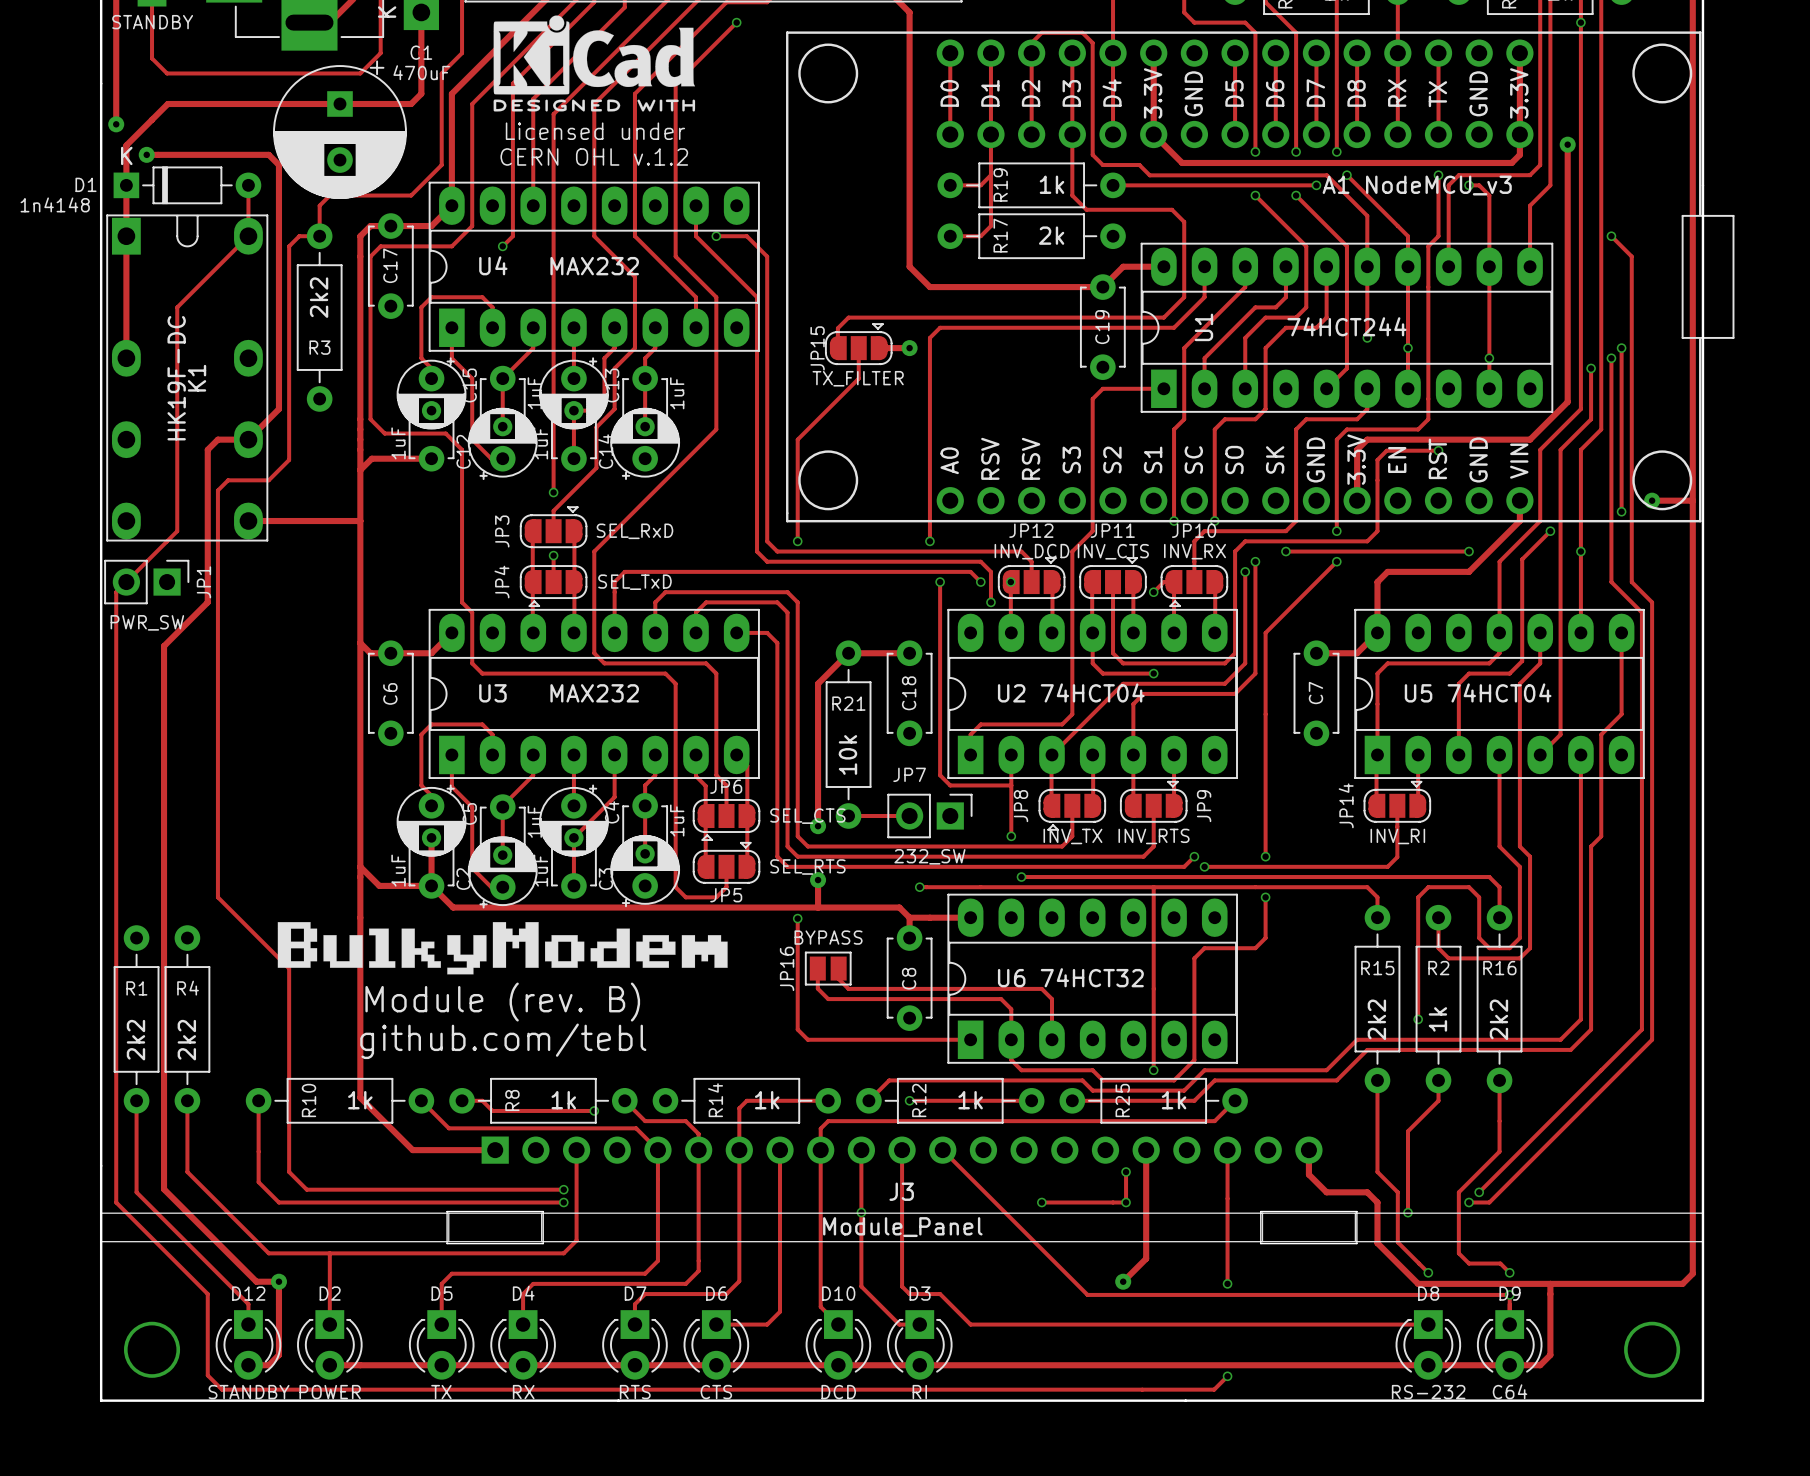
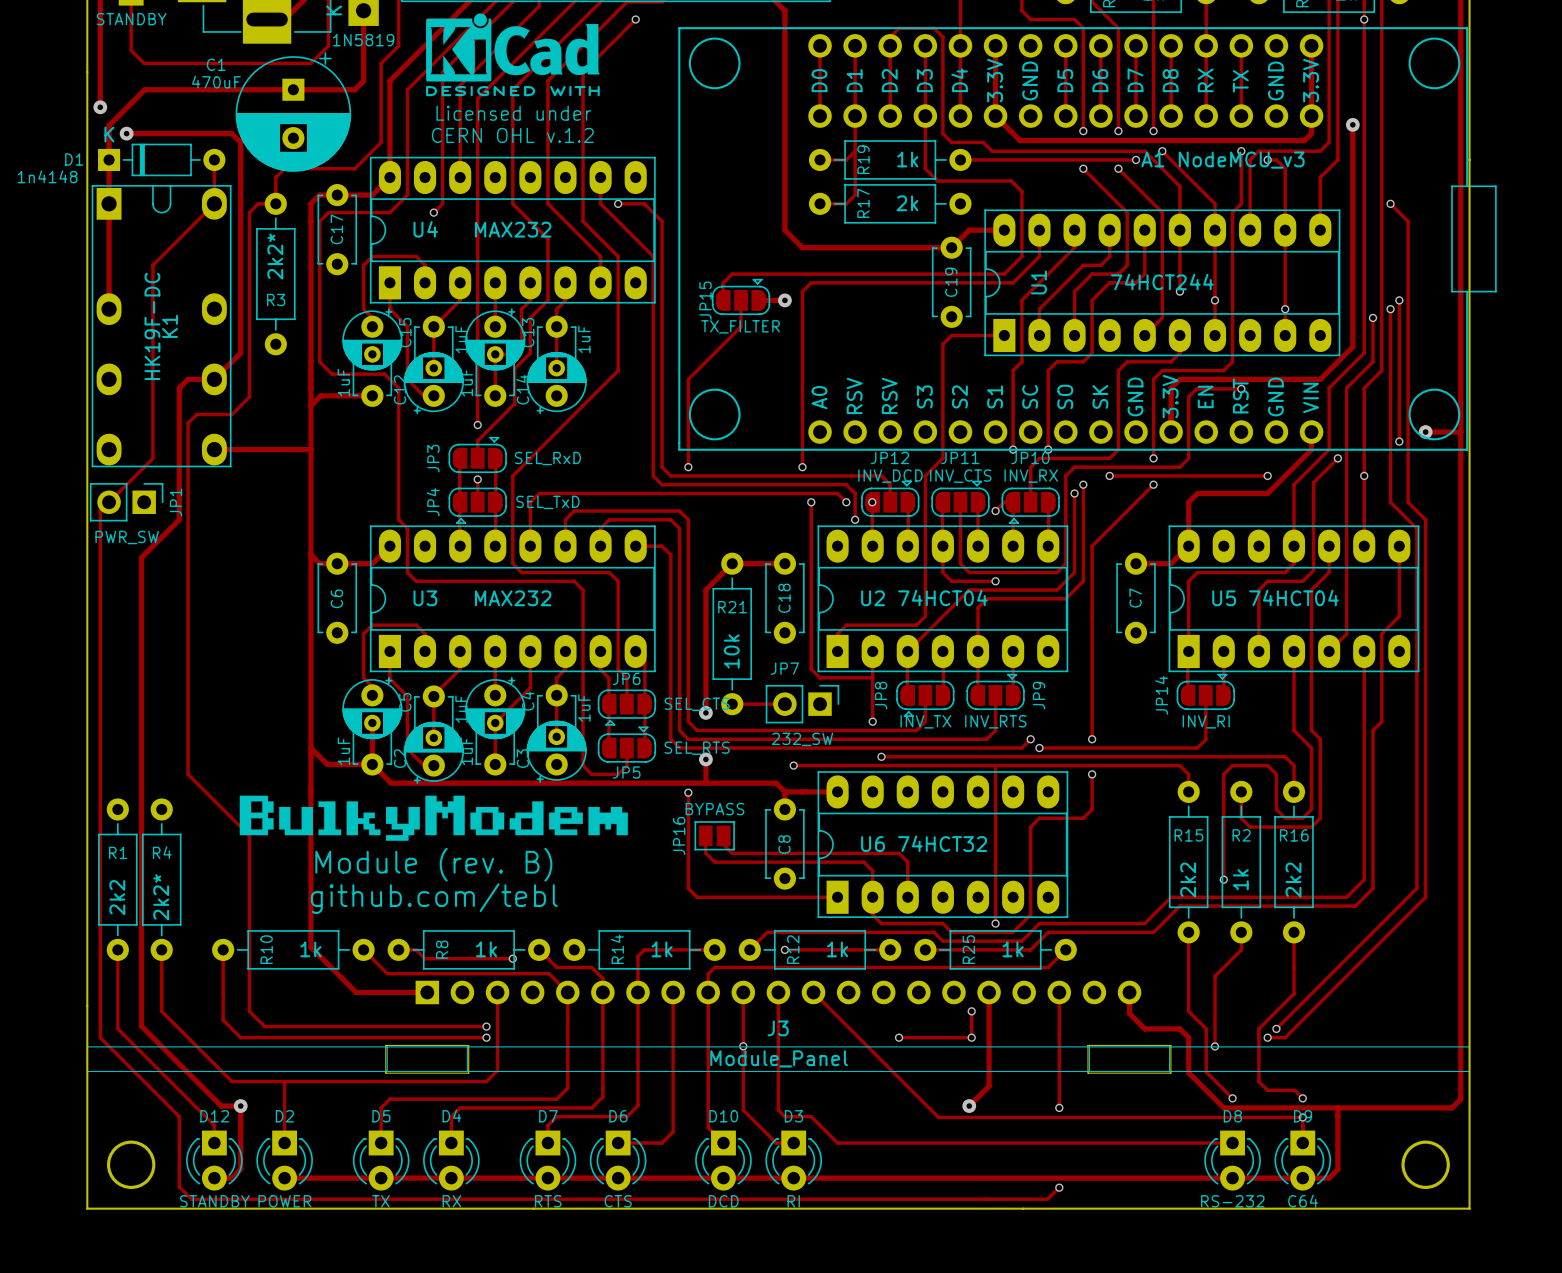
part value: none -> 1N5819 (363, 40)
C1 name position: C1 (421, 52) -> C1 (216, 64)
C1 value position: 470uF (421, 72) -> 470uF (216, 82)
R3 value: 2k2 (319, 297) -> 2k2* (275, 256)
R4 value: 2k2 (186, 1040) -> 2k2* (161, 897)

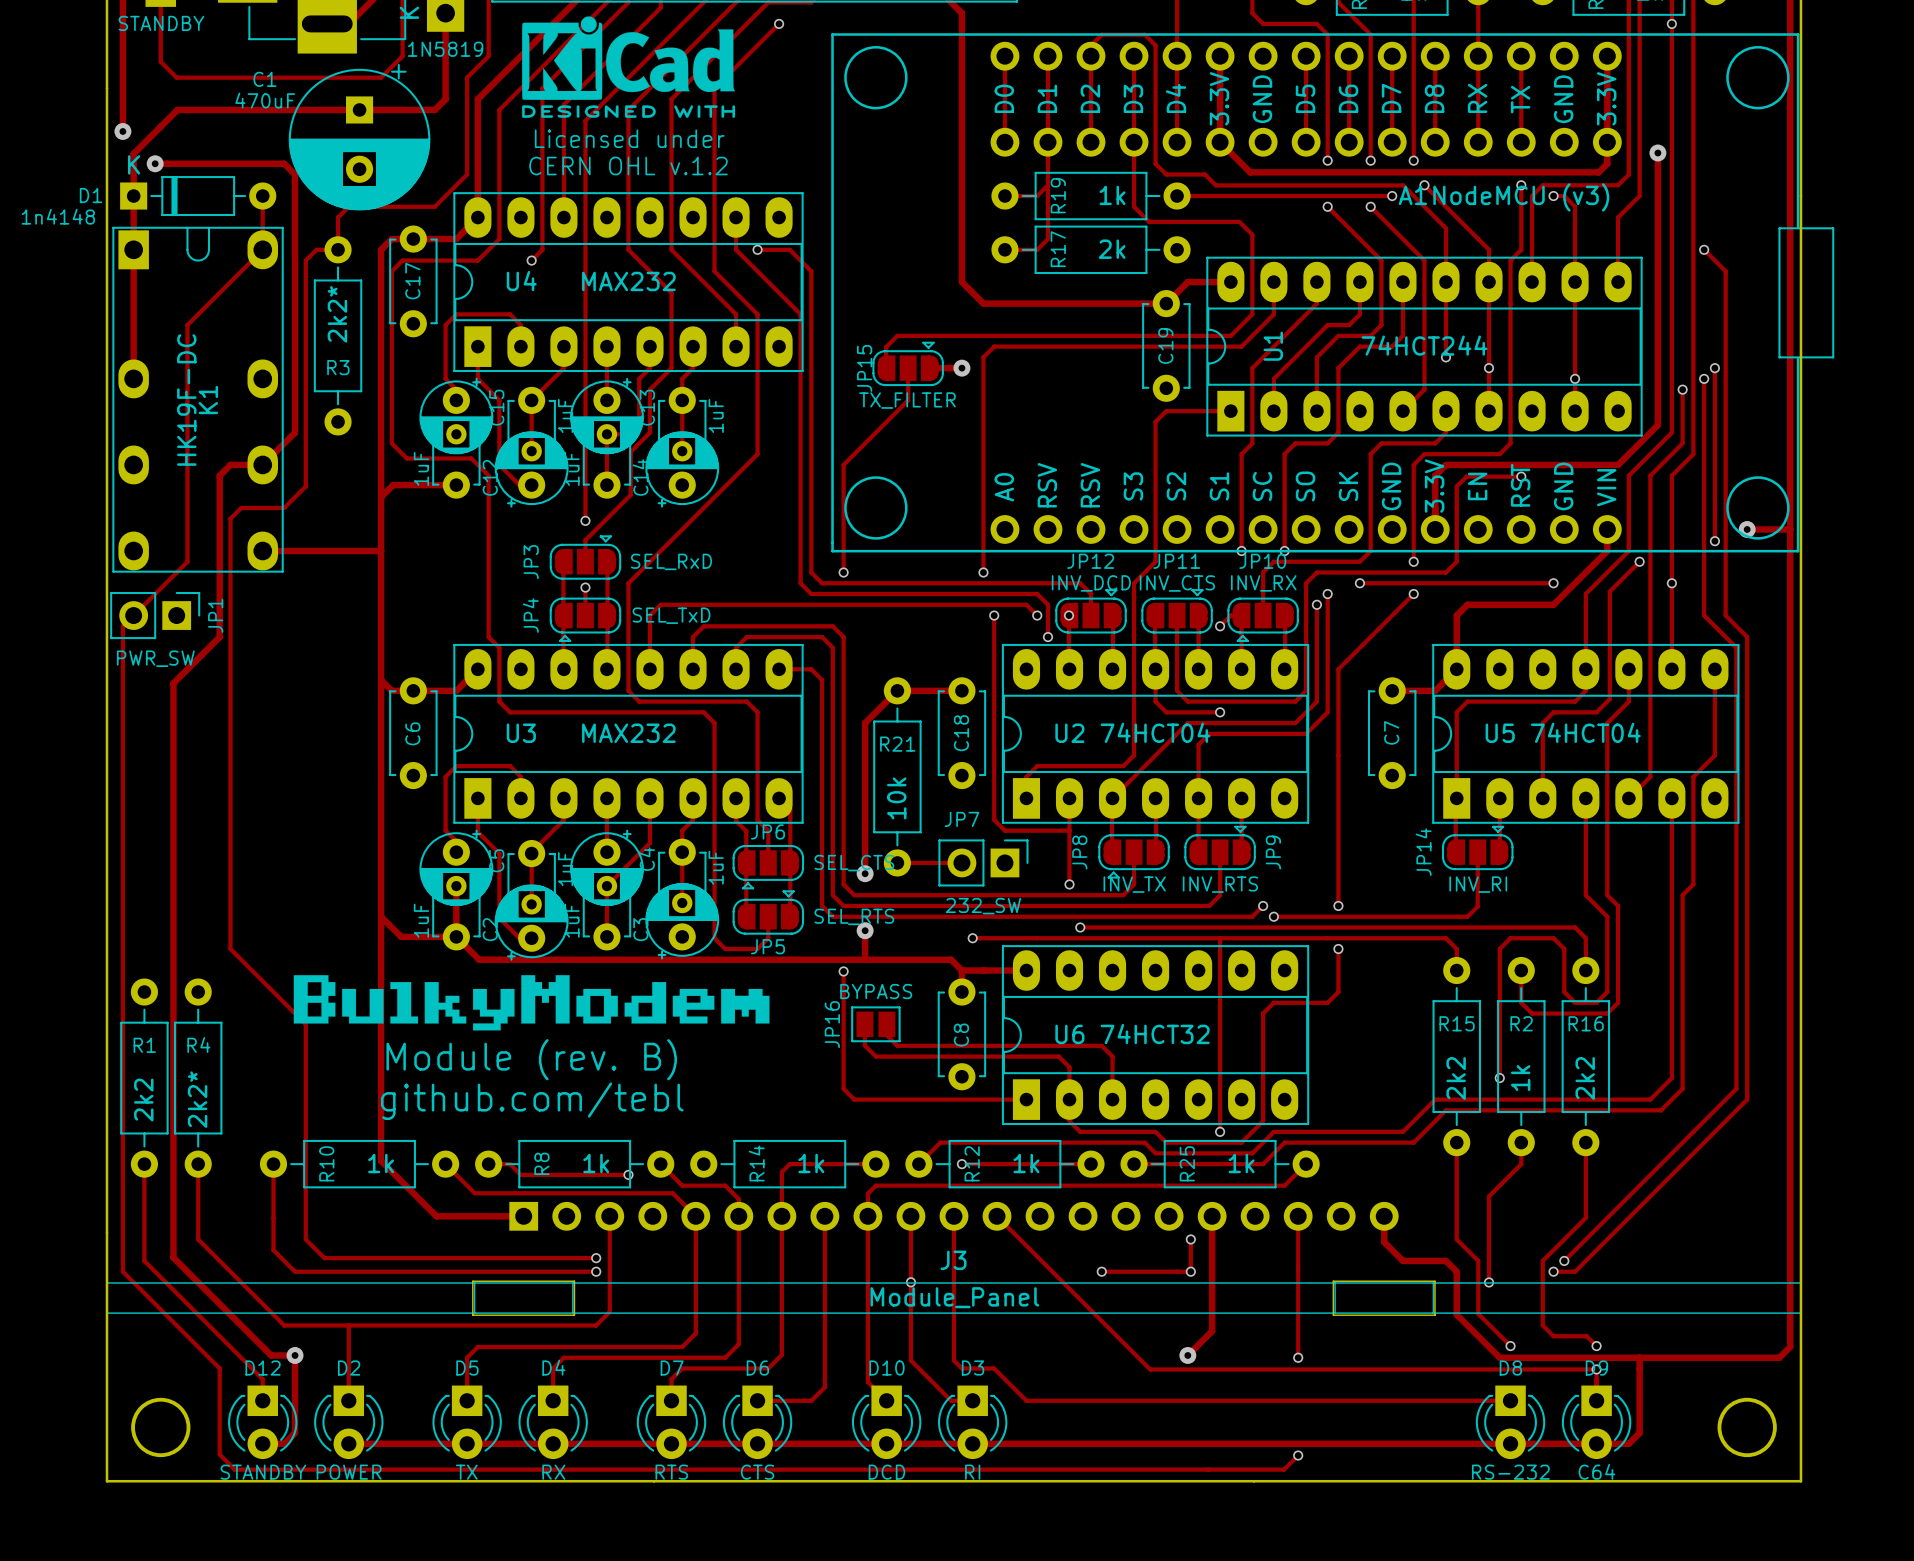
A1 value: NodeMCU_v3 (1241, 160) -> NodeMCU (v3) (1521, 197)

